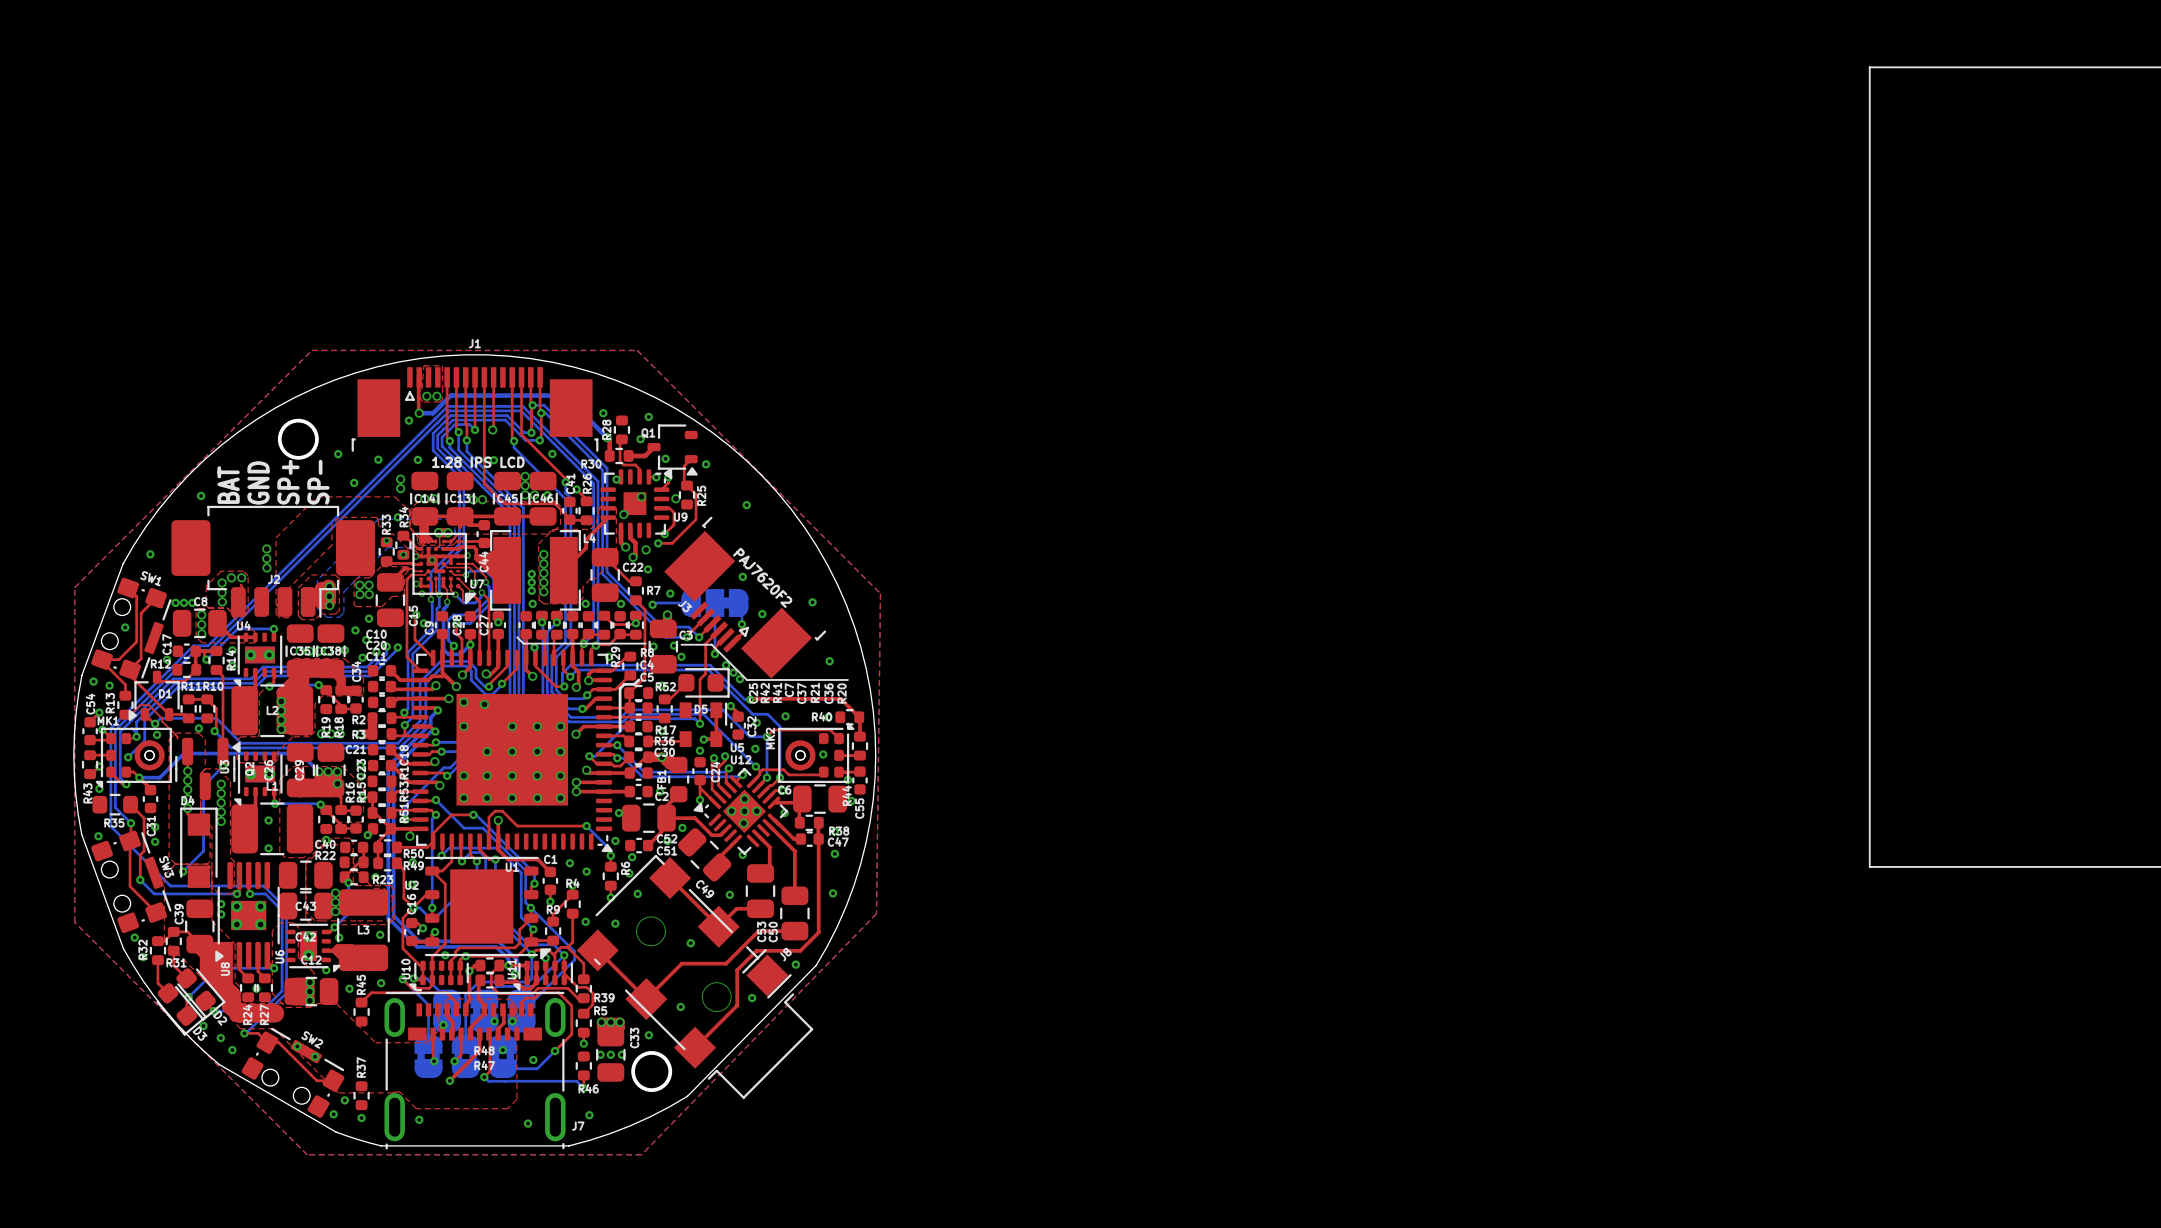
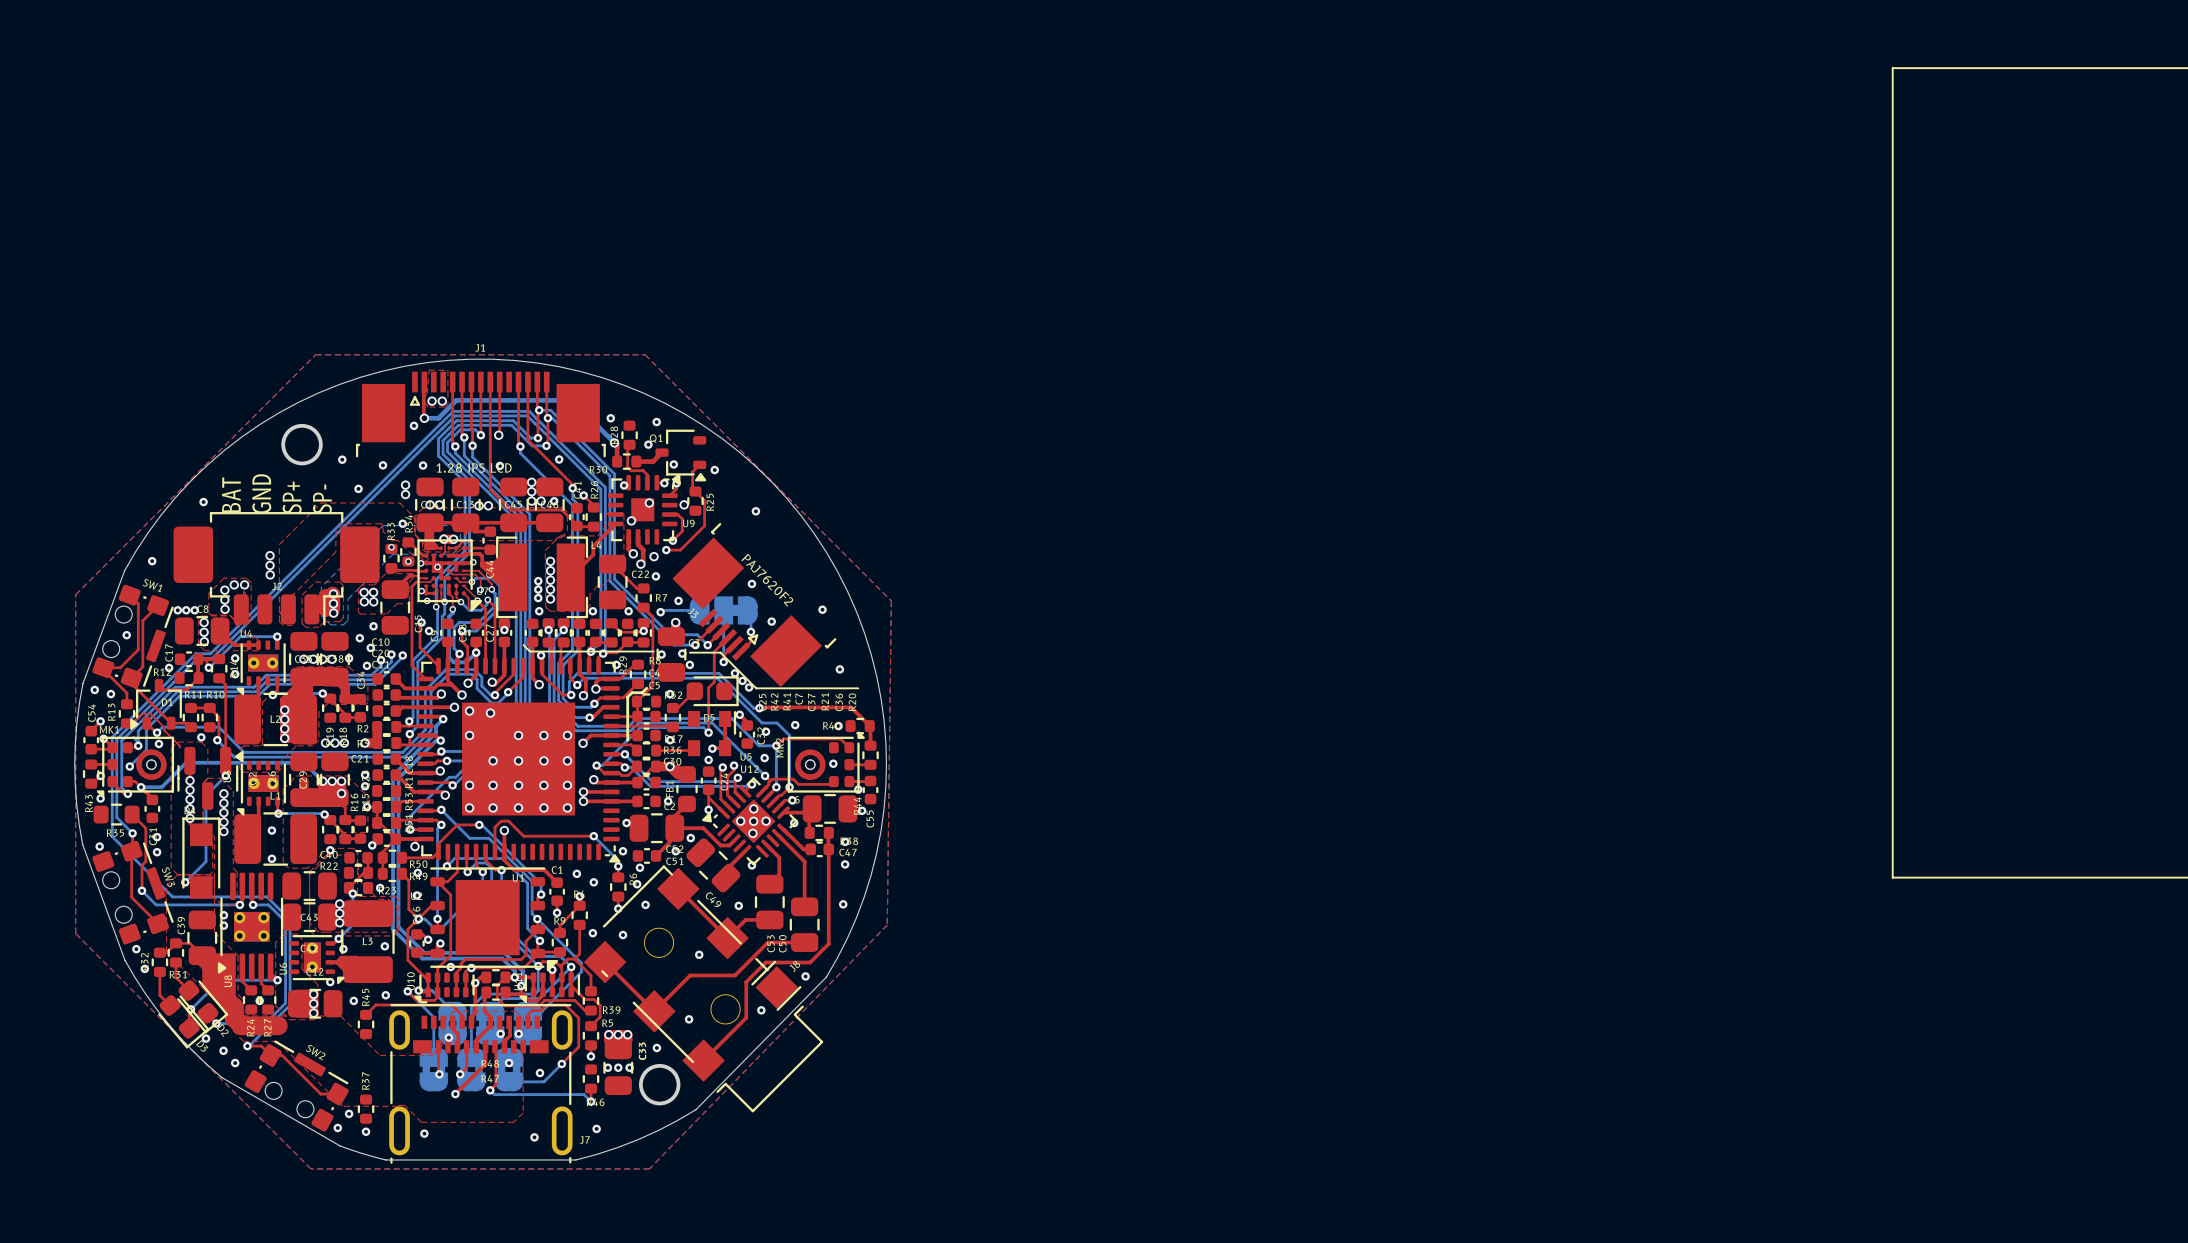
via: (297, 1046) -> none
via: (315, 1056) -> none

